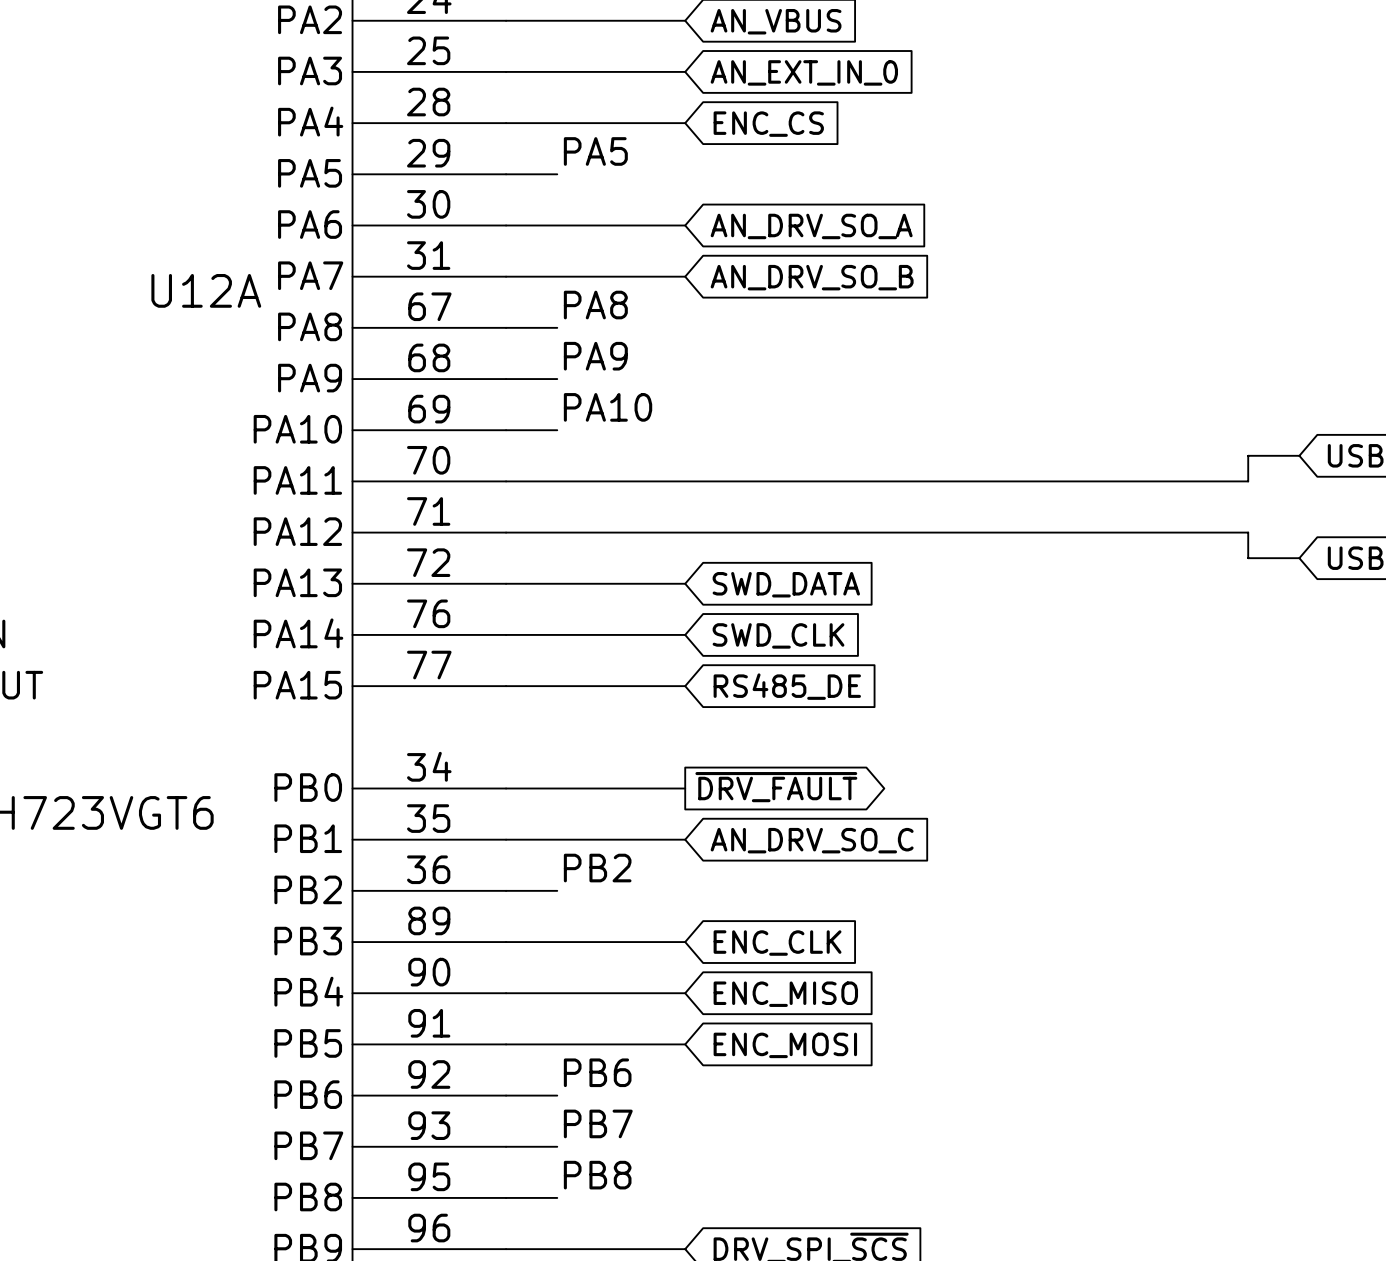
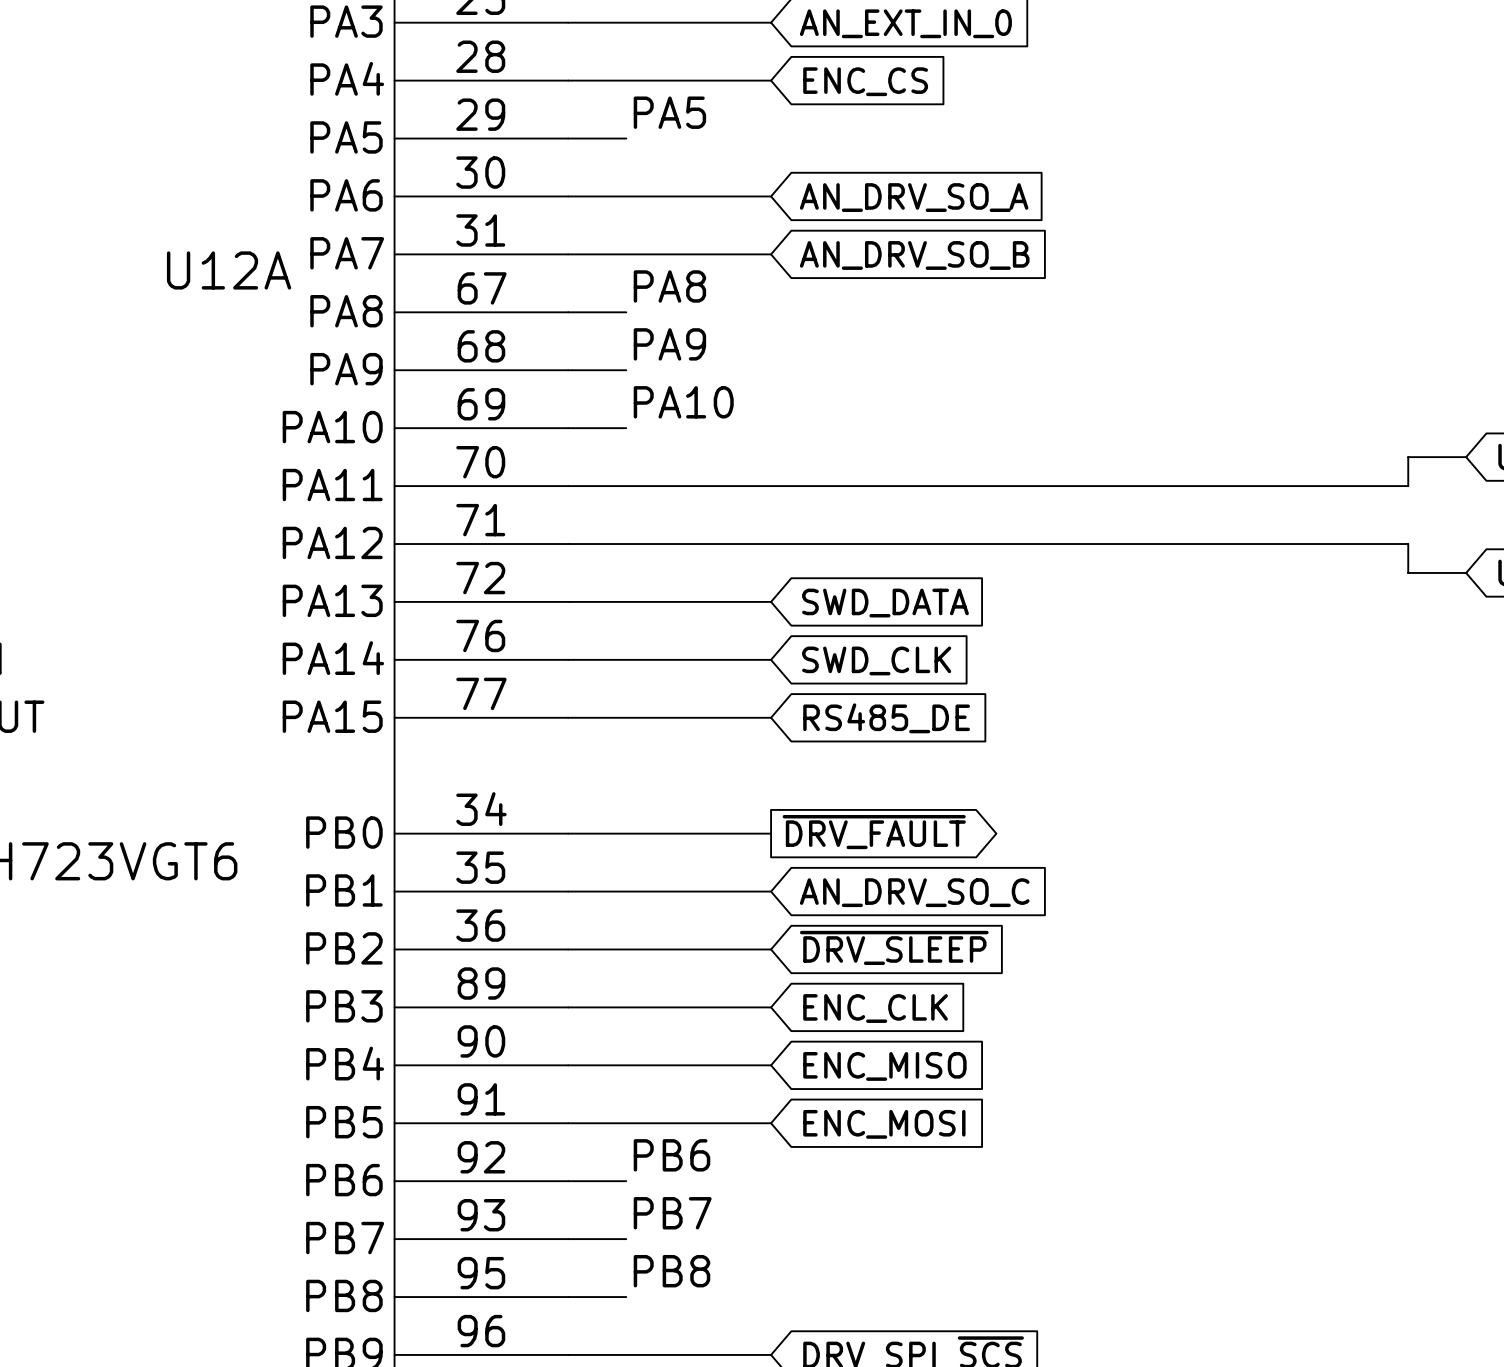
label: PB2 (597, 868) -> none
global label: none -> ~{DRV_SLEEP} (894, 947)
wire: none -> (626, 949) (771, 949)

